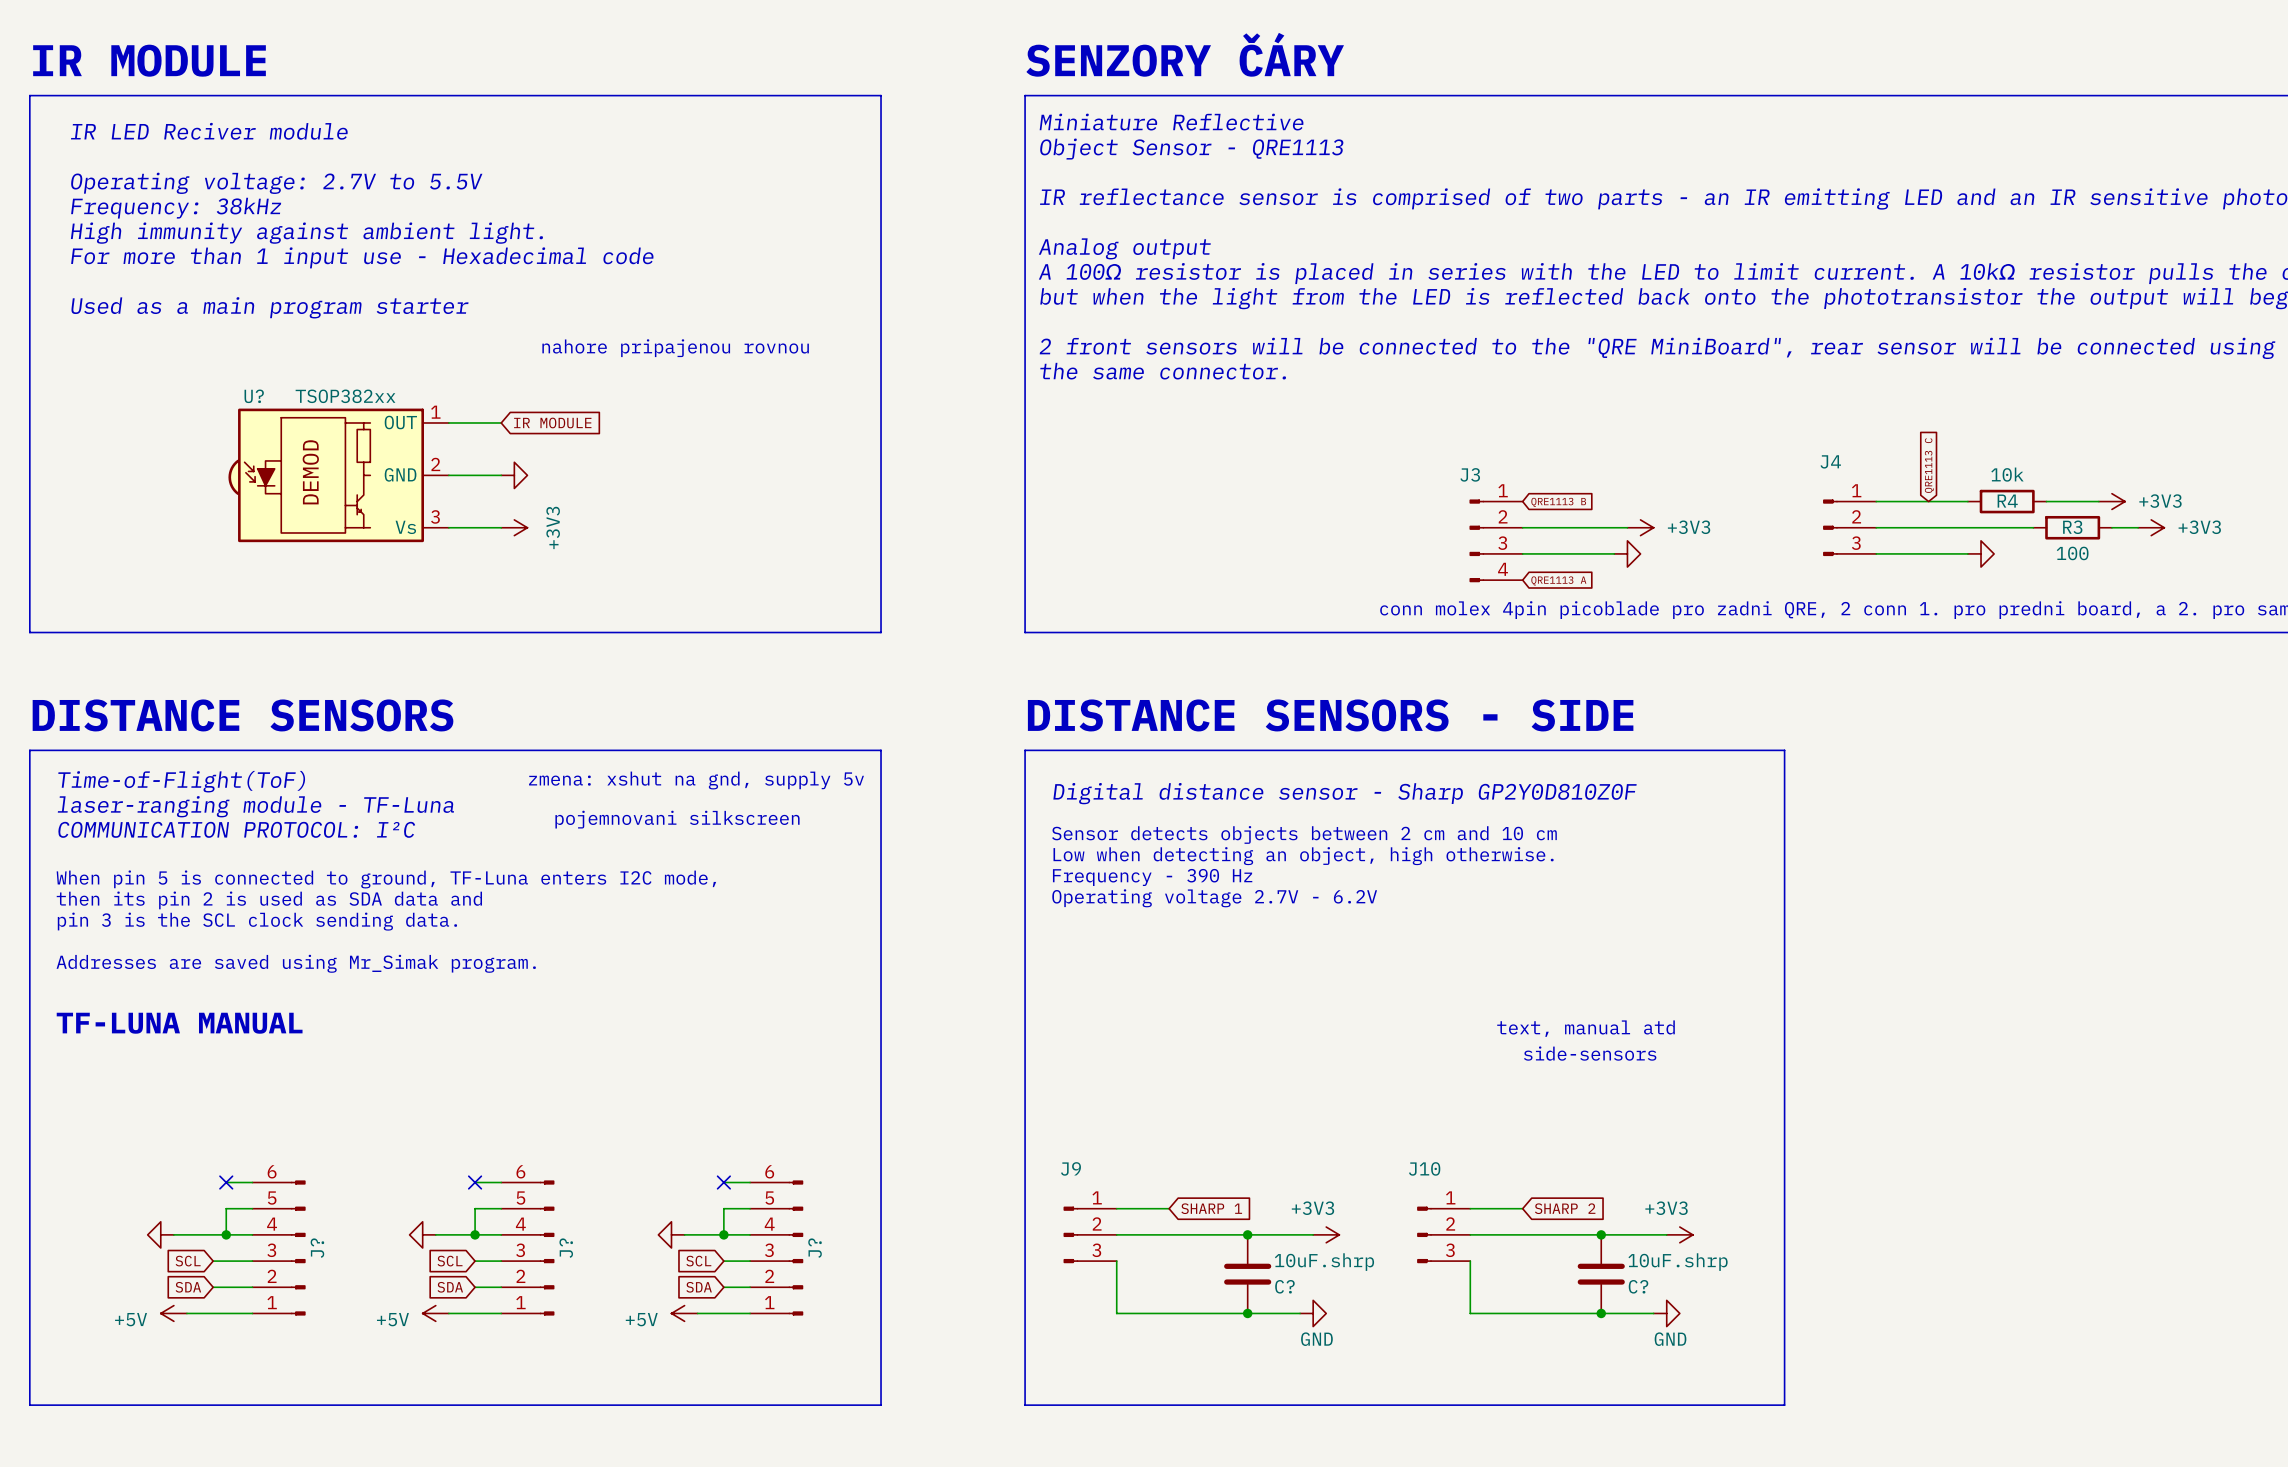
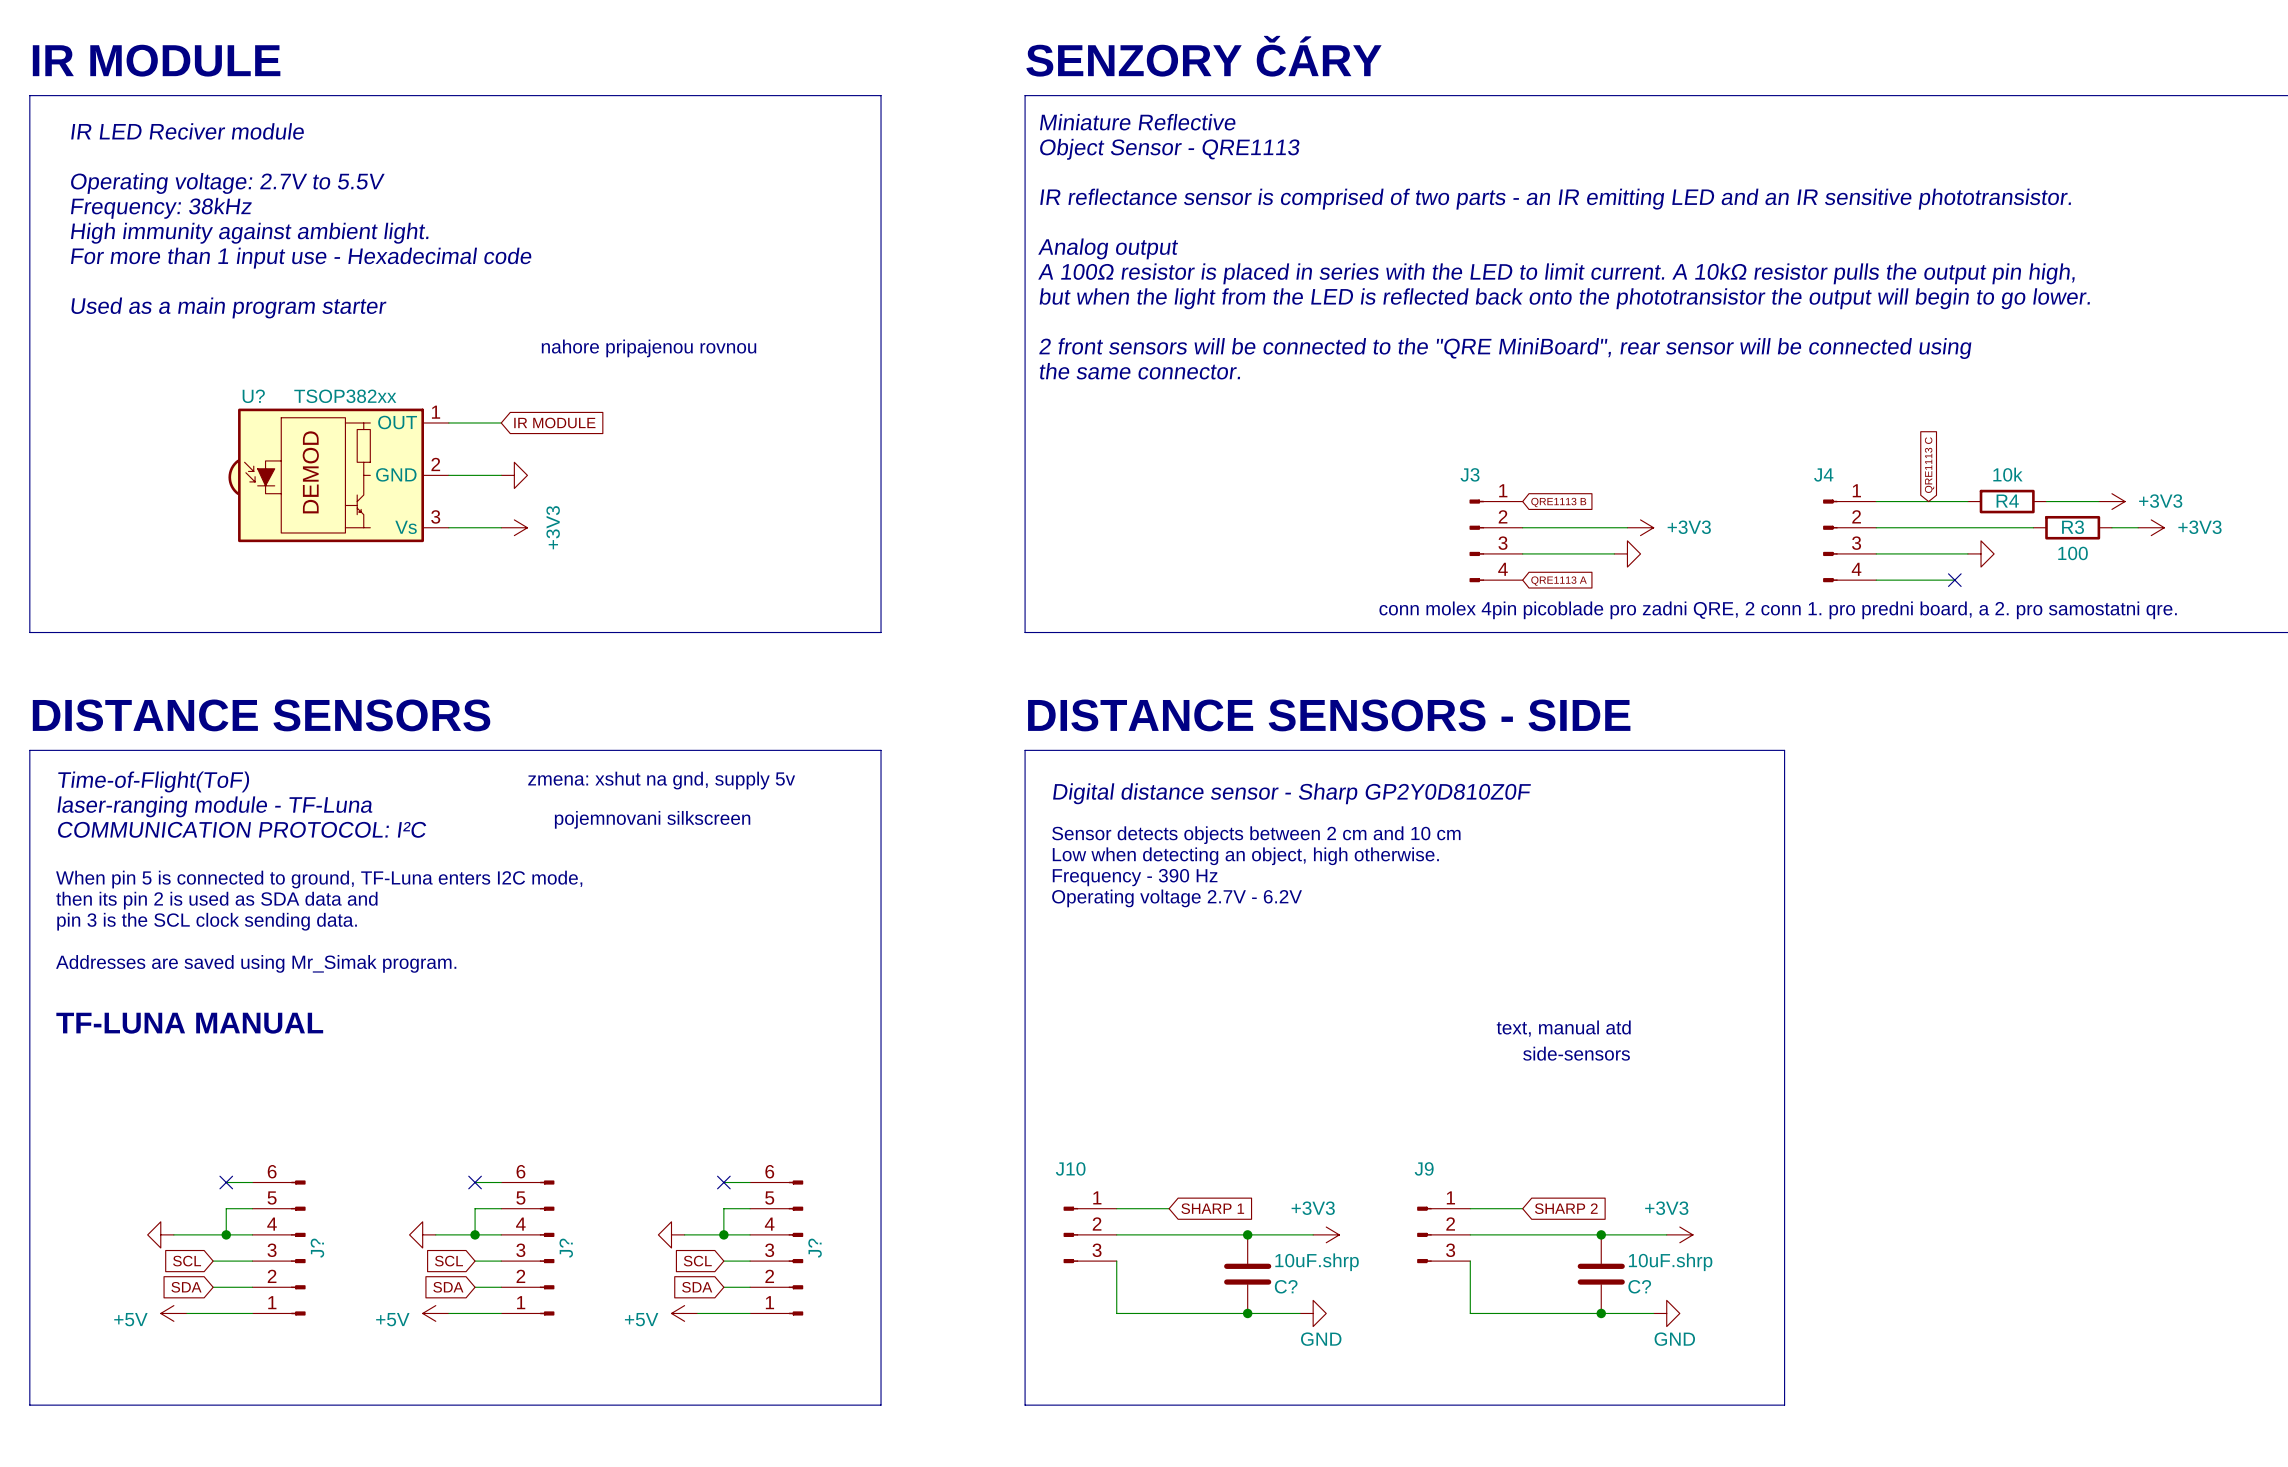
J4 symbol: [1823, 499, 1877, 557] -> [1823, 499, 1877, 583]
wire: none -> (1876, 580) (1954, 580)
no-connect mark: none -> (1954, 580)
J9 name: J9 (1070, 1168) -> J10 (1070, 1168)
J10 name: J10 (1424, 1168) -> J9 (1424, 1168)

